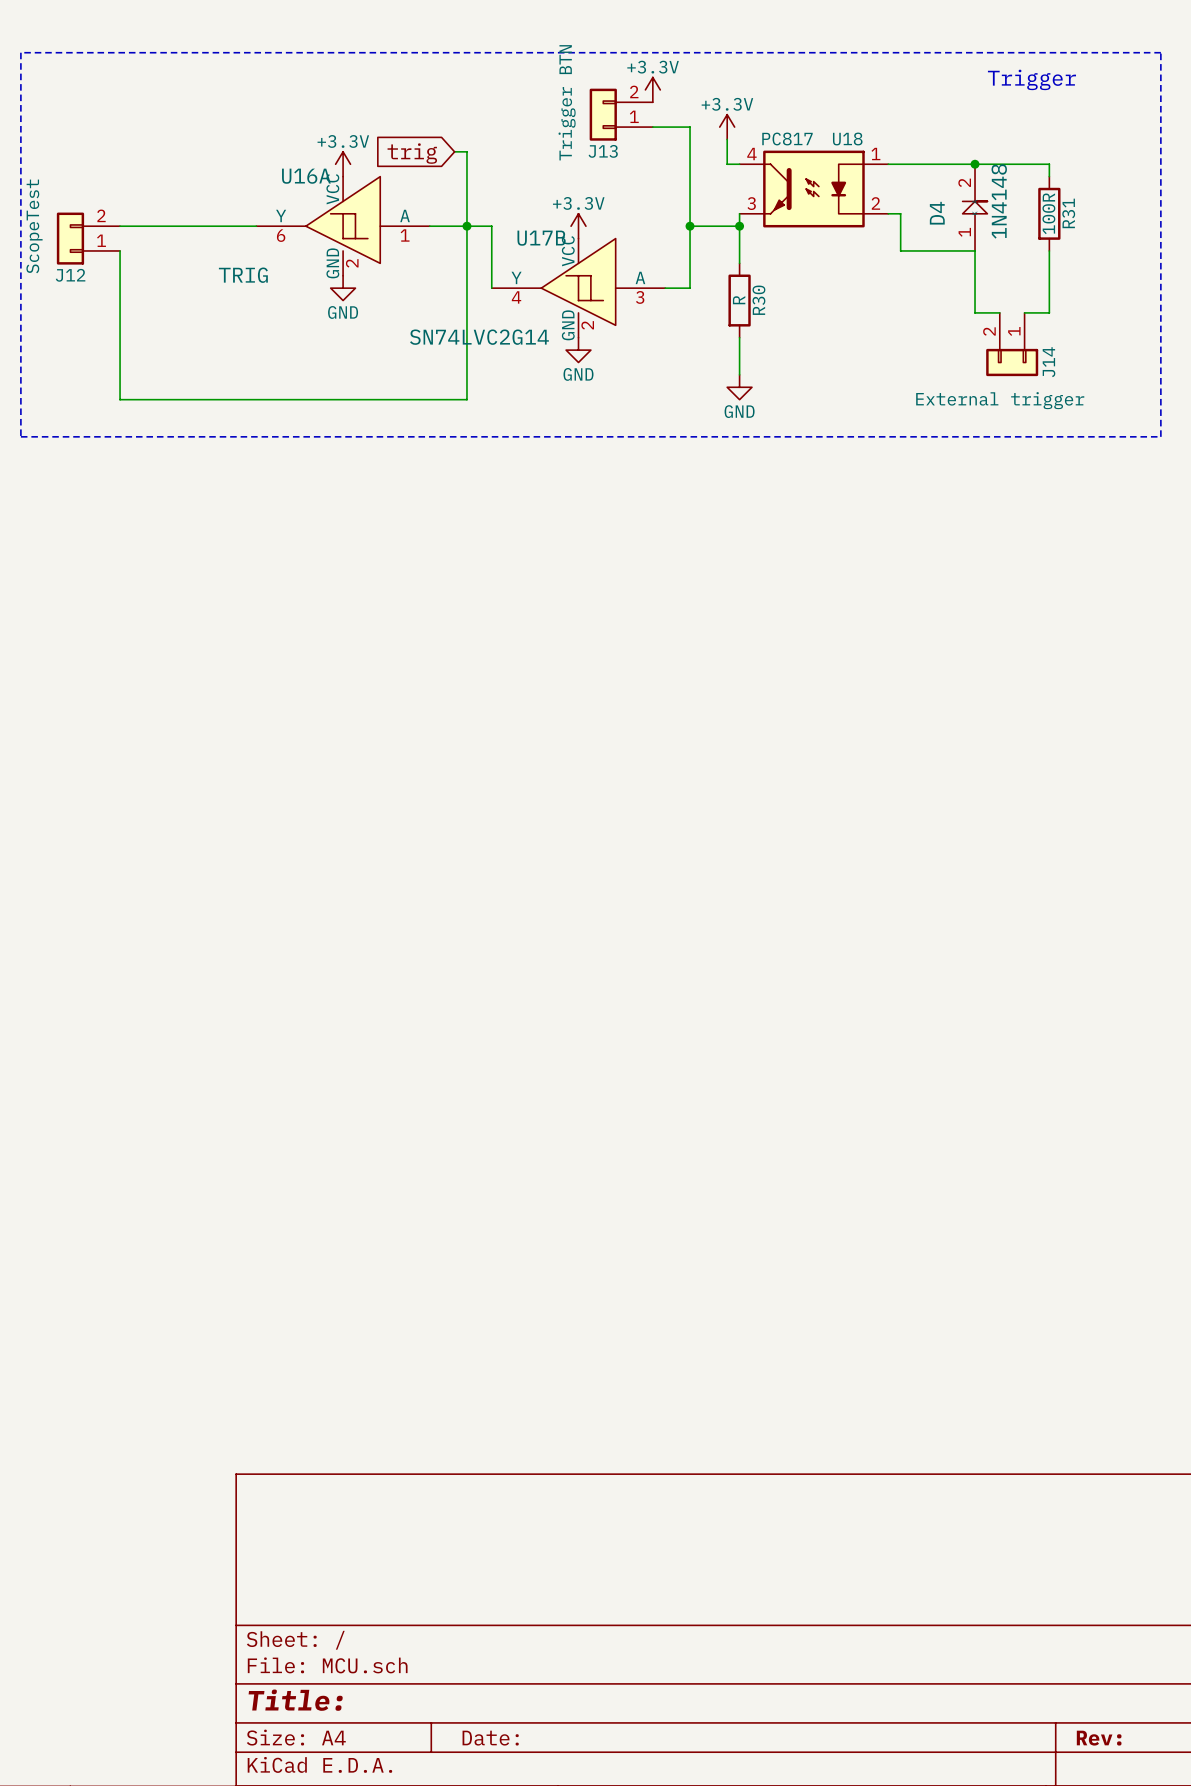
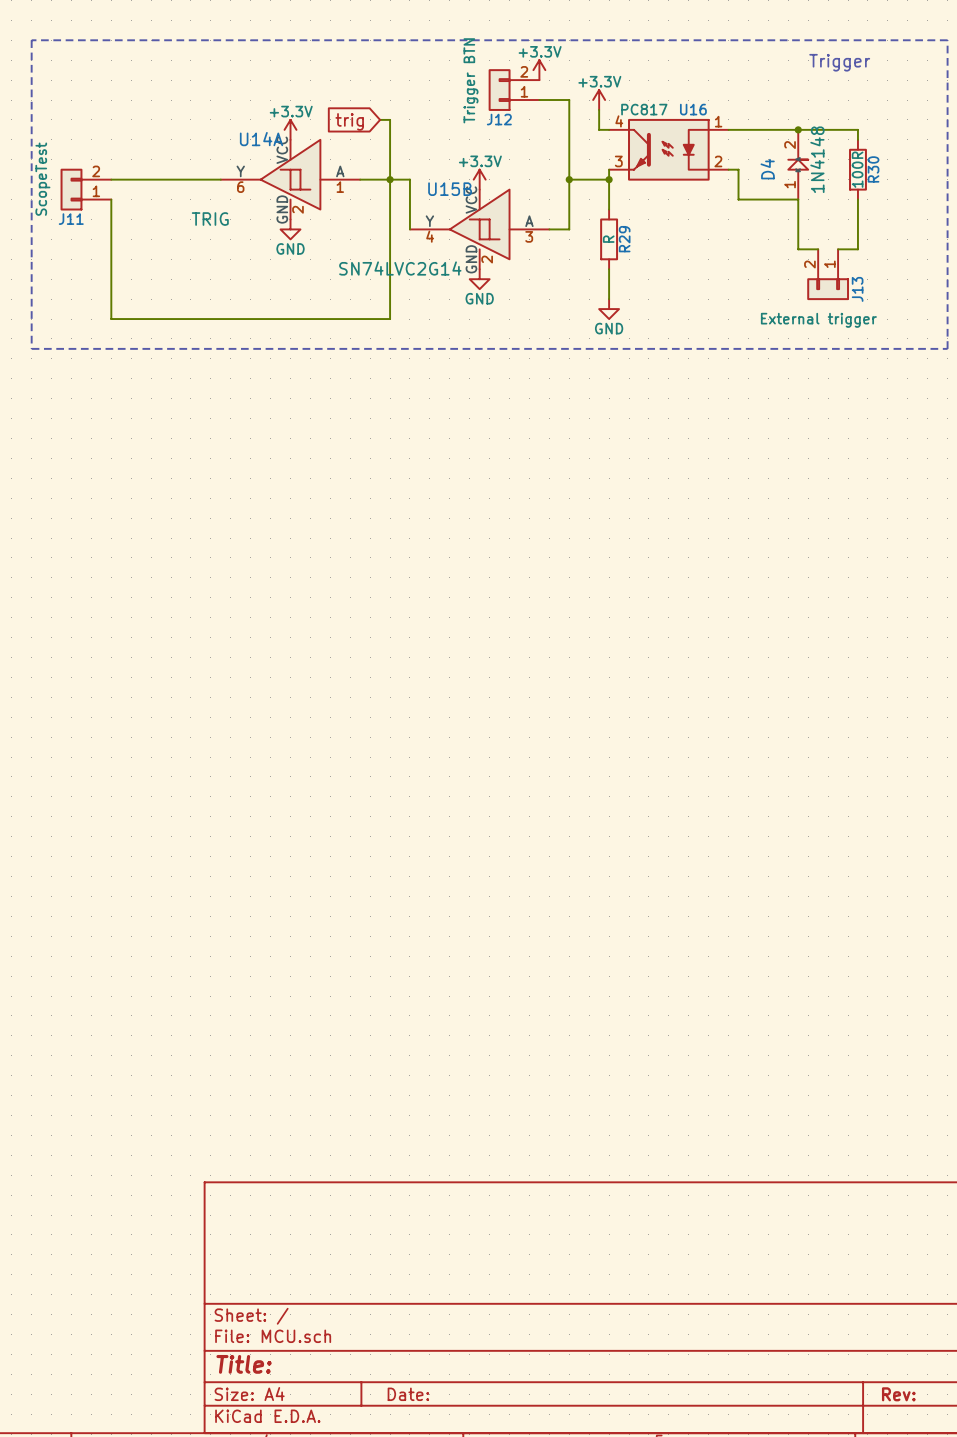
U18 name: U18 (847, 139) -> U16 (693, 109)
J13 name: J13 (603, 151) -> J12 (499, 119)
U16A name: U16A (306, 176) -> U14A (261, 139)
R31 name: R31 (1068, 213) -> R30 (873, 169)
U17B name: U17B (541, 238) -> U15B (450, 189)
J12 name: J12 (70, 275) -> J11 (71, 219)
R30 name: R30 (758, 300) -> R29 (624, 239)
J14 name: J14 (1049, 362) -> J13 (857, 289)

